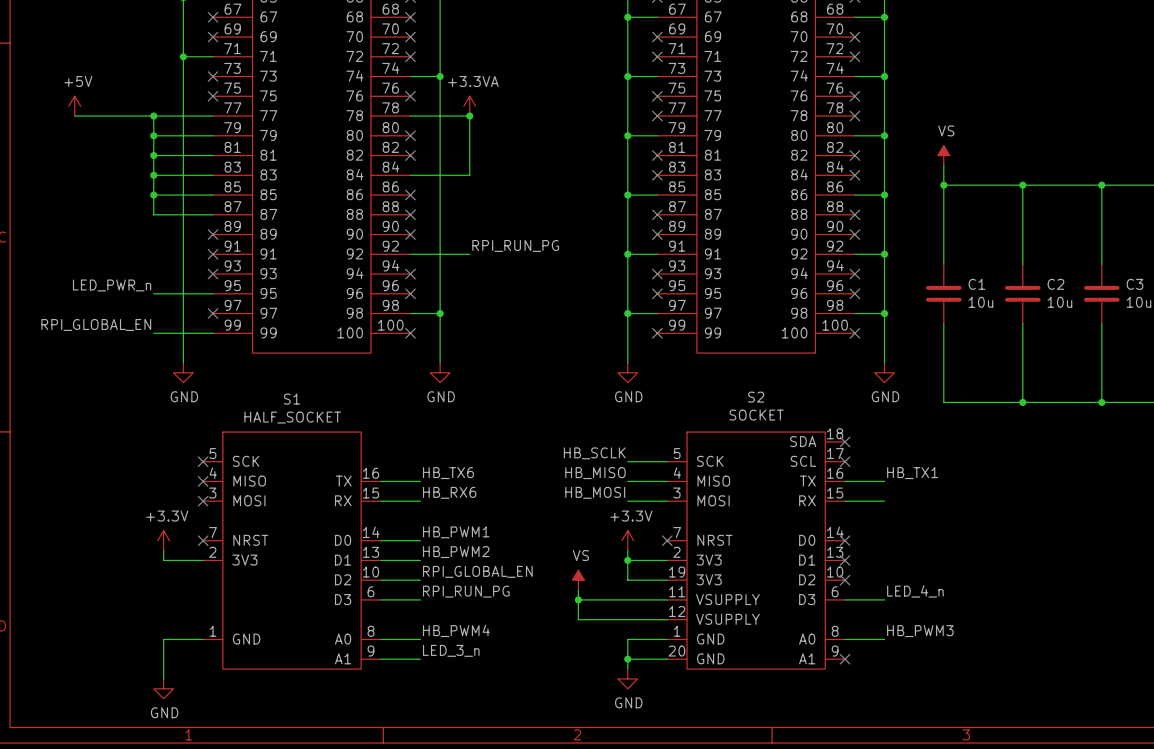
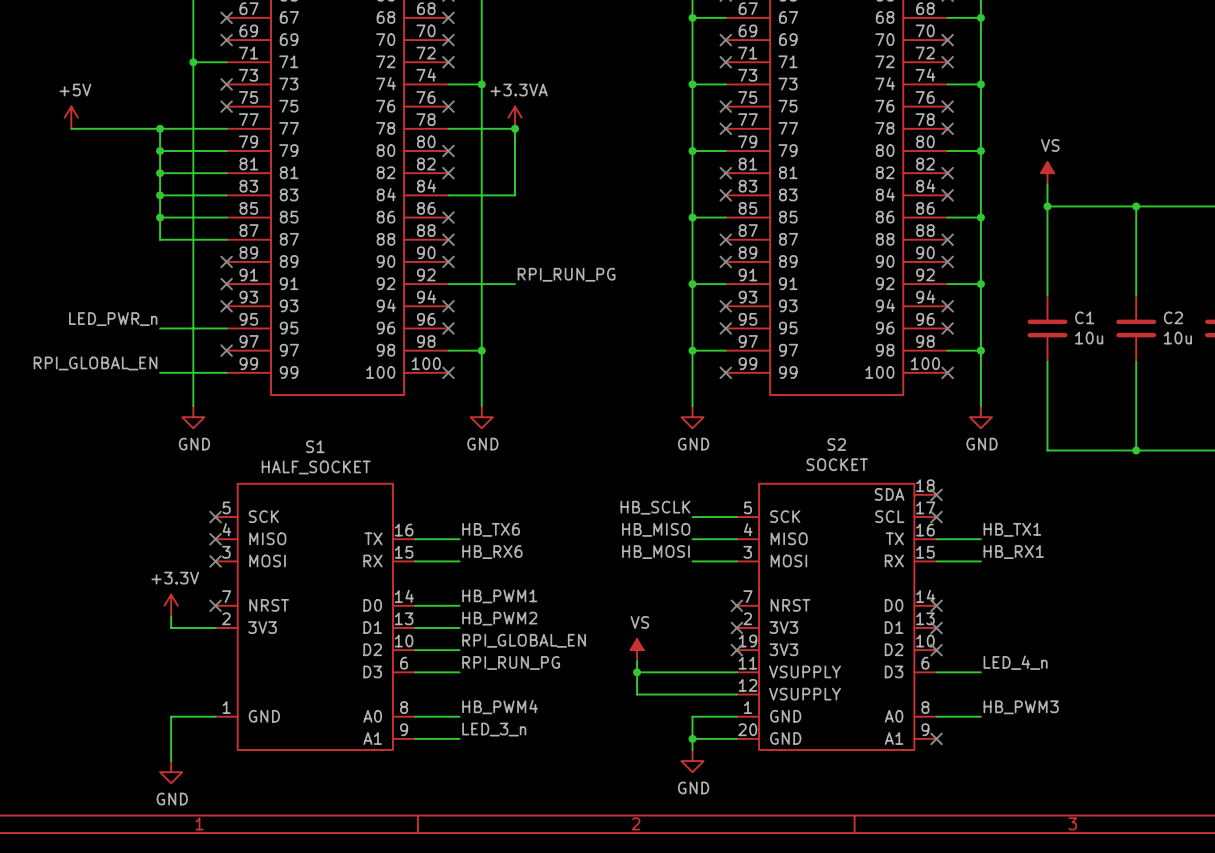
label: none -> HB_RX1 (1013, 552)
power symbol: +3.3V (627, 540) -> none
wire: (627, 550) (627, 580) (667, 580) -> none
wire: (627, 560) (667, 560) -> none
junction: (627, 560) -> none
no-connect mark: none -> (736, 627)
no-connect mark: none -> (736, 650)

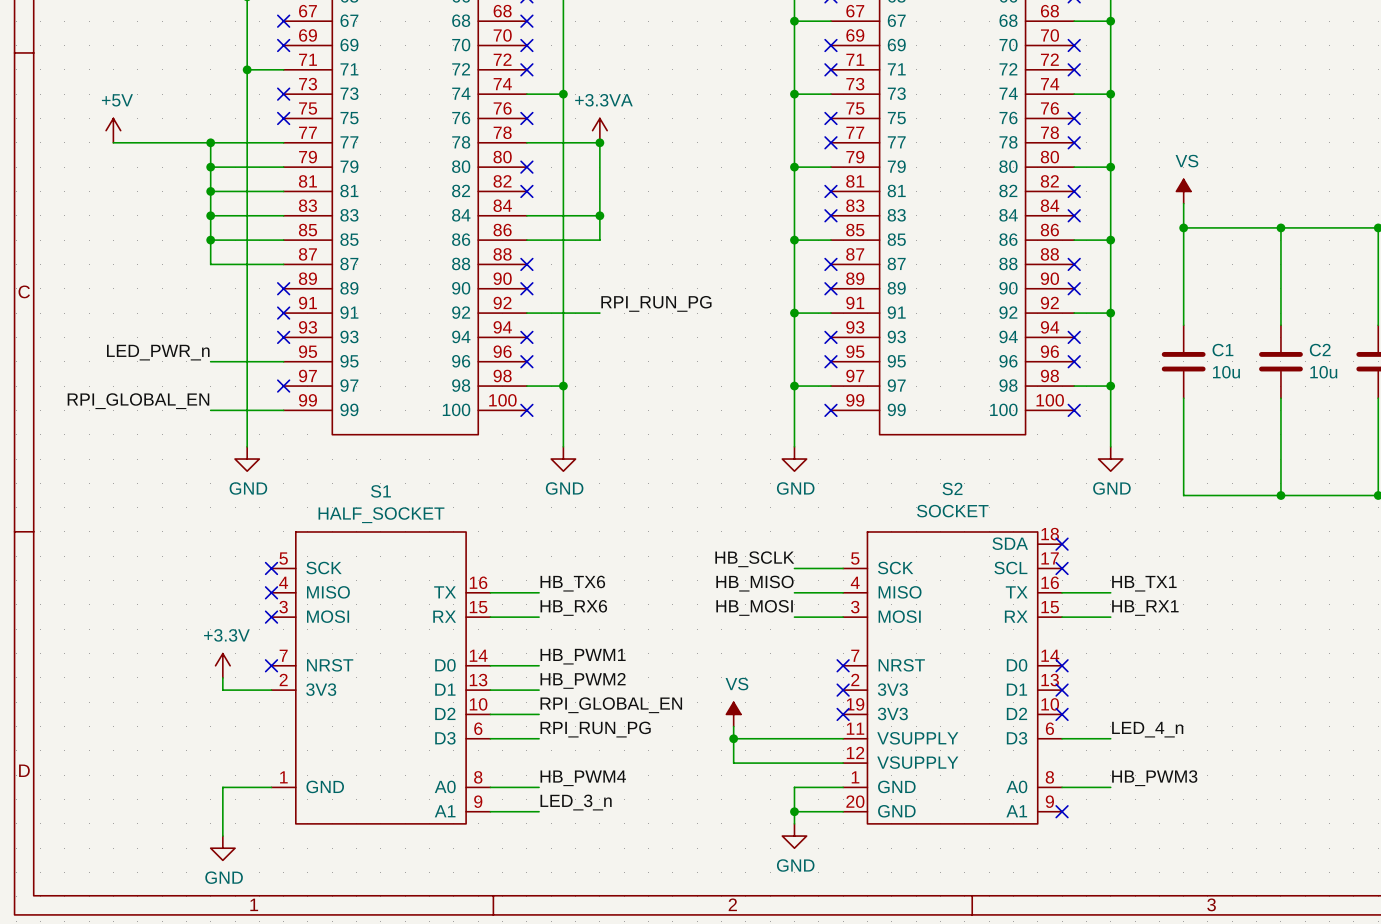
wire: none -> (599, 215) (599, 240) (526, 240)
junction: none -> (599, 215)
no-connect mark: (448, 217) -> none

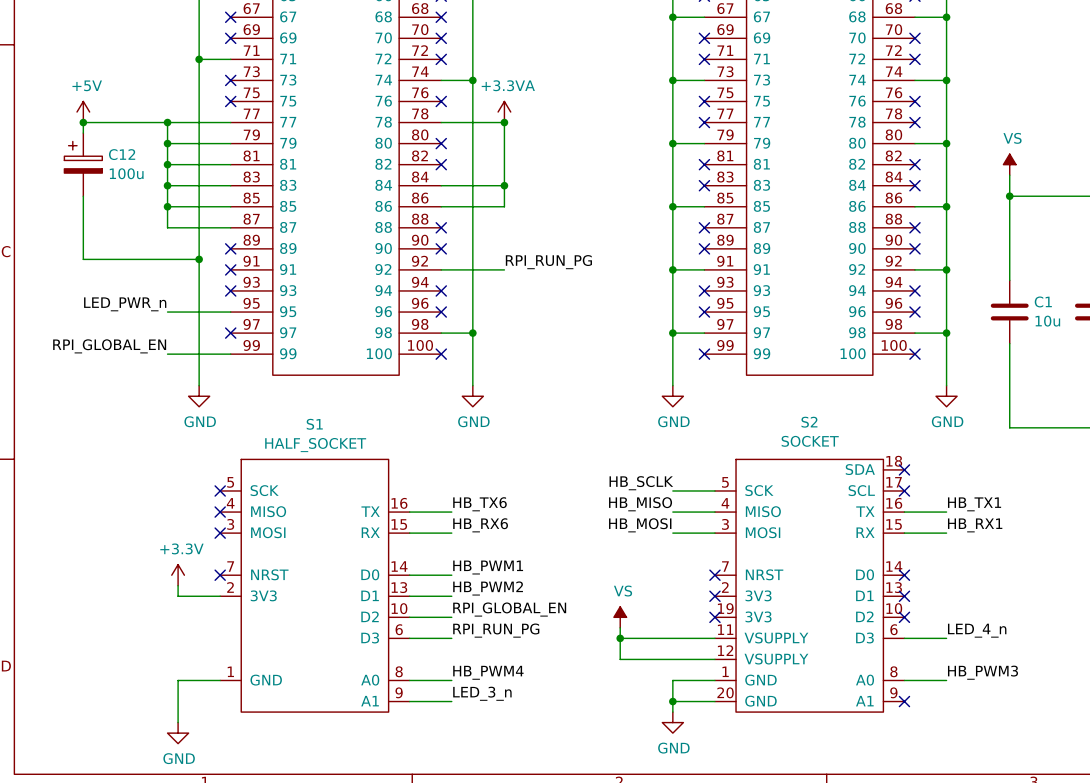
wire: none -> (83, 122) (83, 133)
junction: none -> (83, 122)
C12: none -> 100u (83, 164)
wire: none -> (83, 196) (83, 259) (199, 259)
junction: none -> (199, 259)

